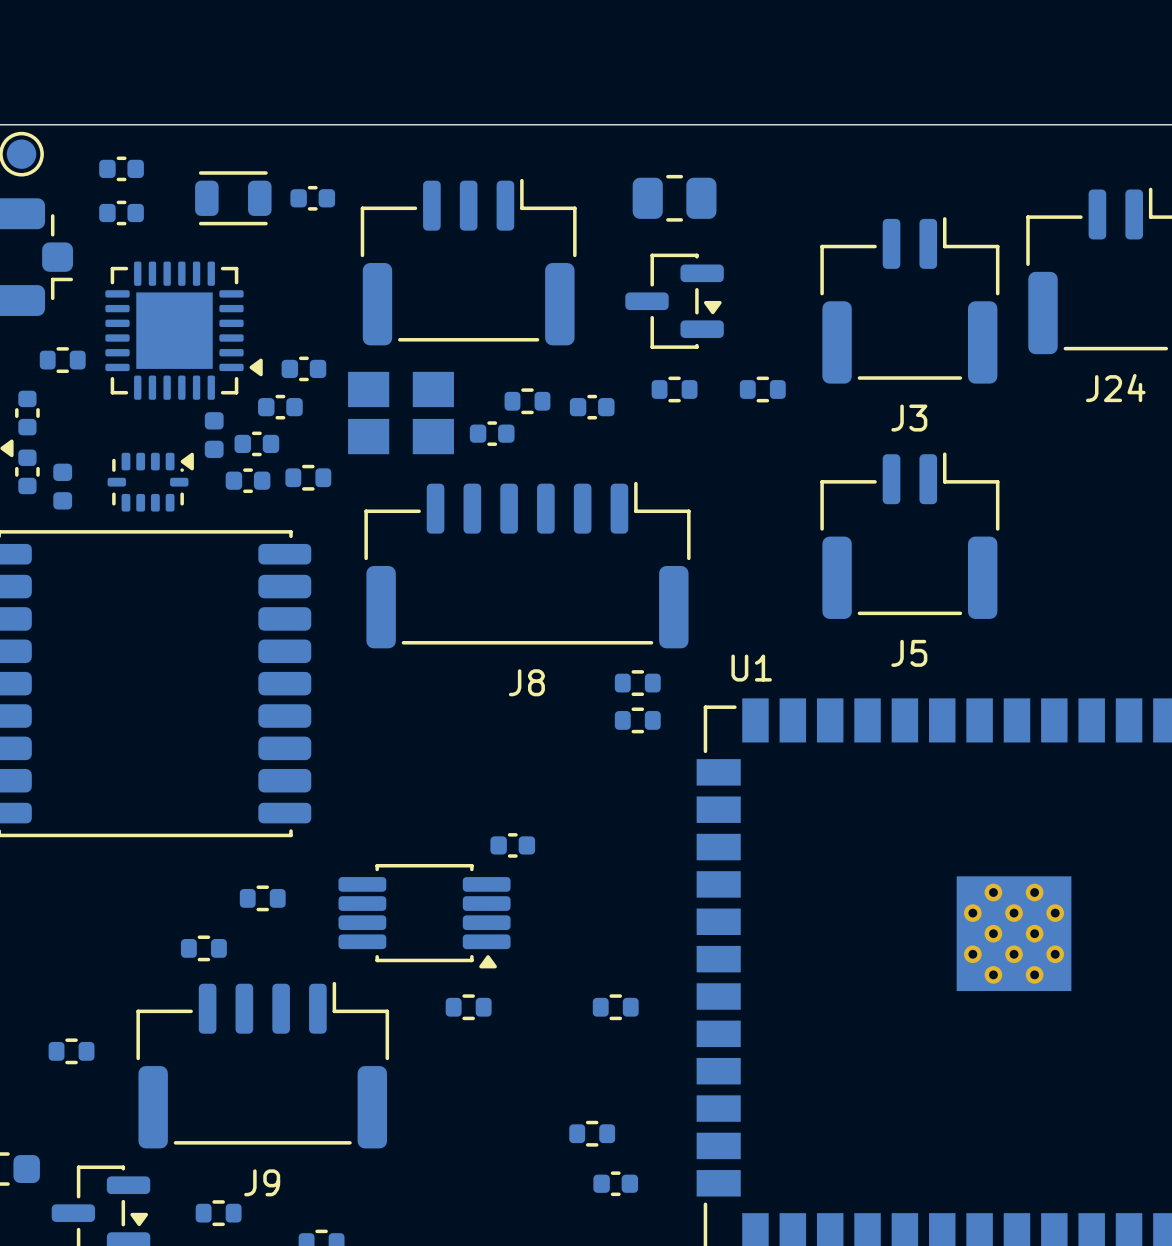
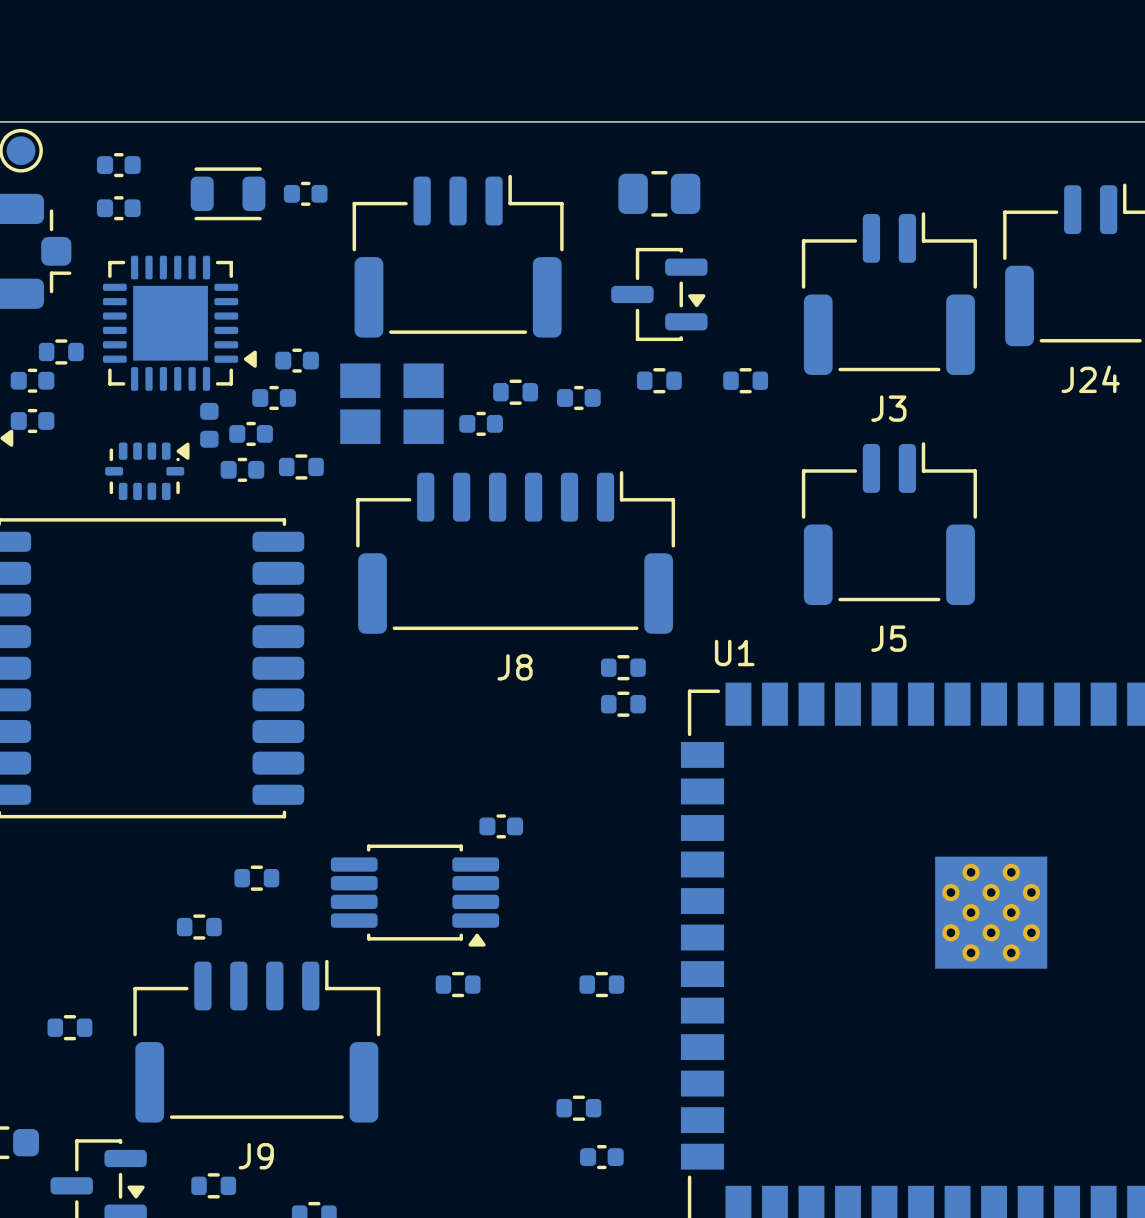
part: none -> (32, 380)
part: (27, 413) -> none
part: none -> (32, 420)
part: (27, 471) -> none
part: (62, 486) -> none

